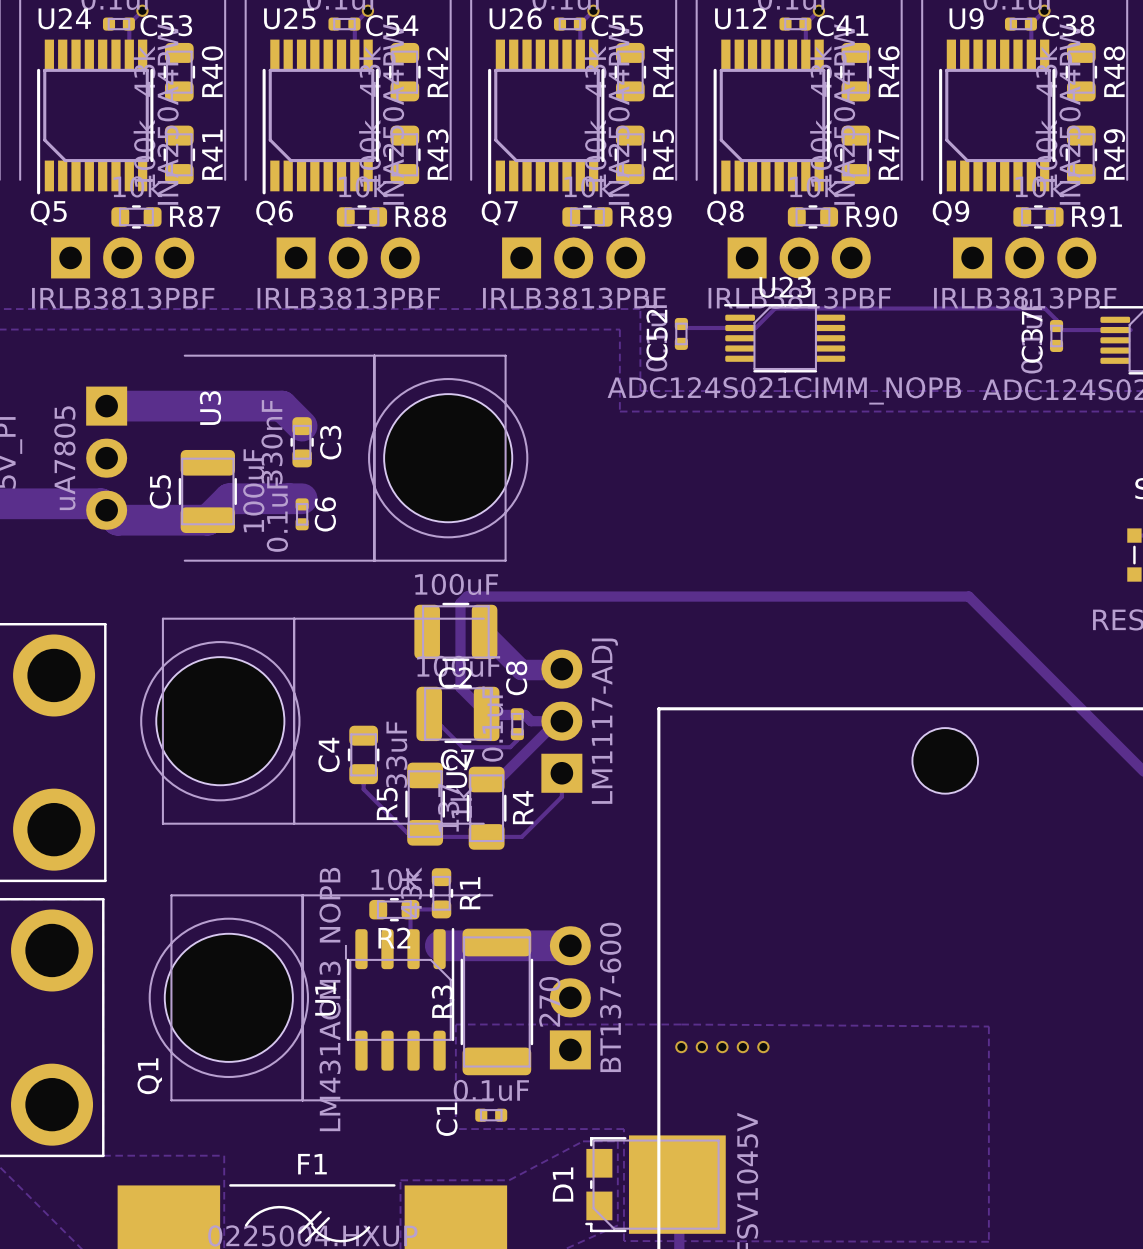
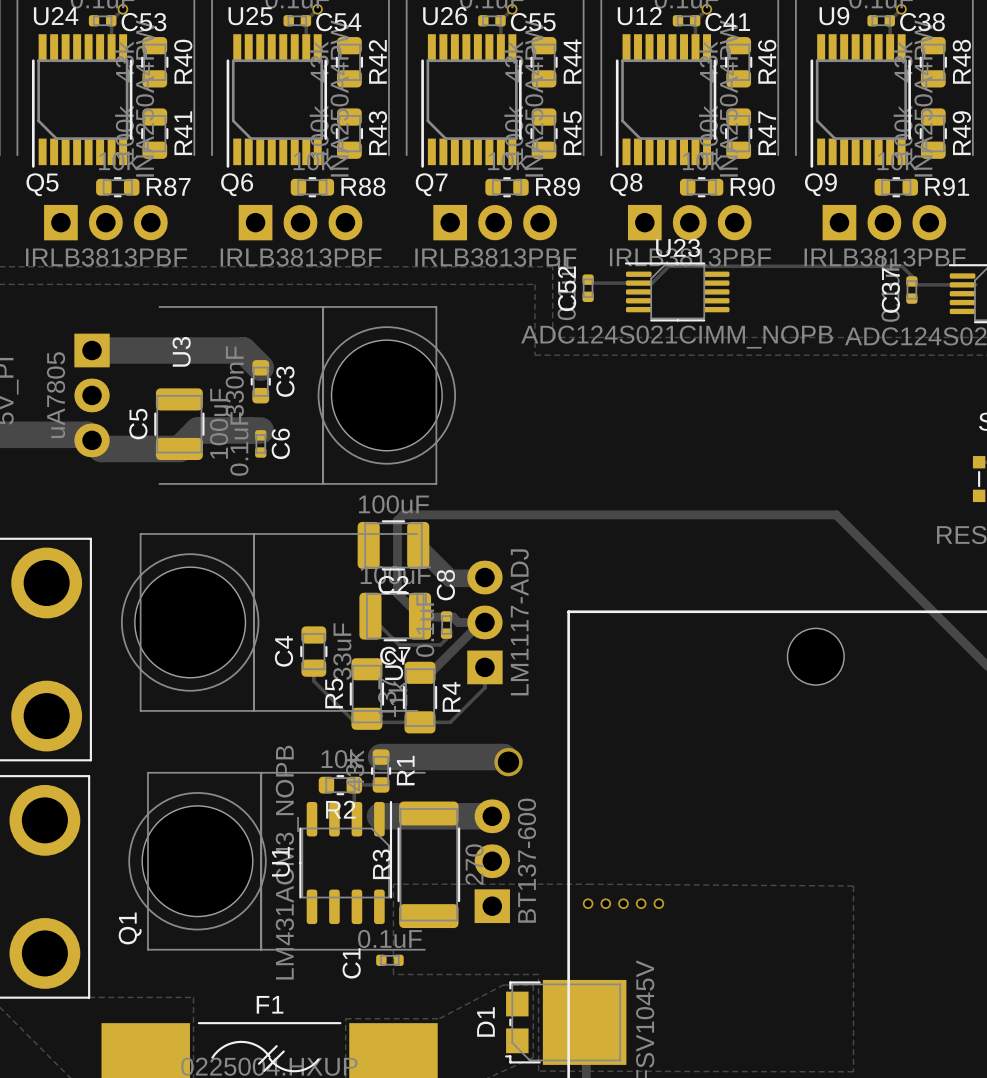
track: none -> (381, 757) (503, 757) (508, 762)
via: none -> (508, 762)
C1 position: (491, 1115) -> (389, 960)

